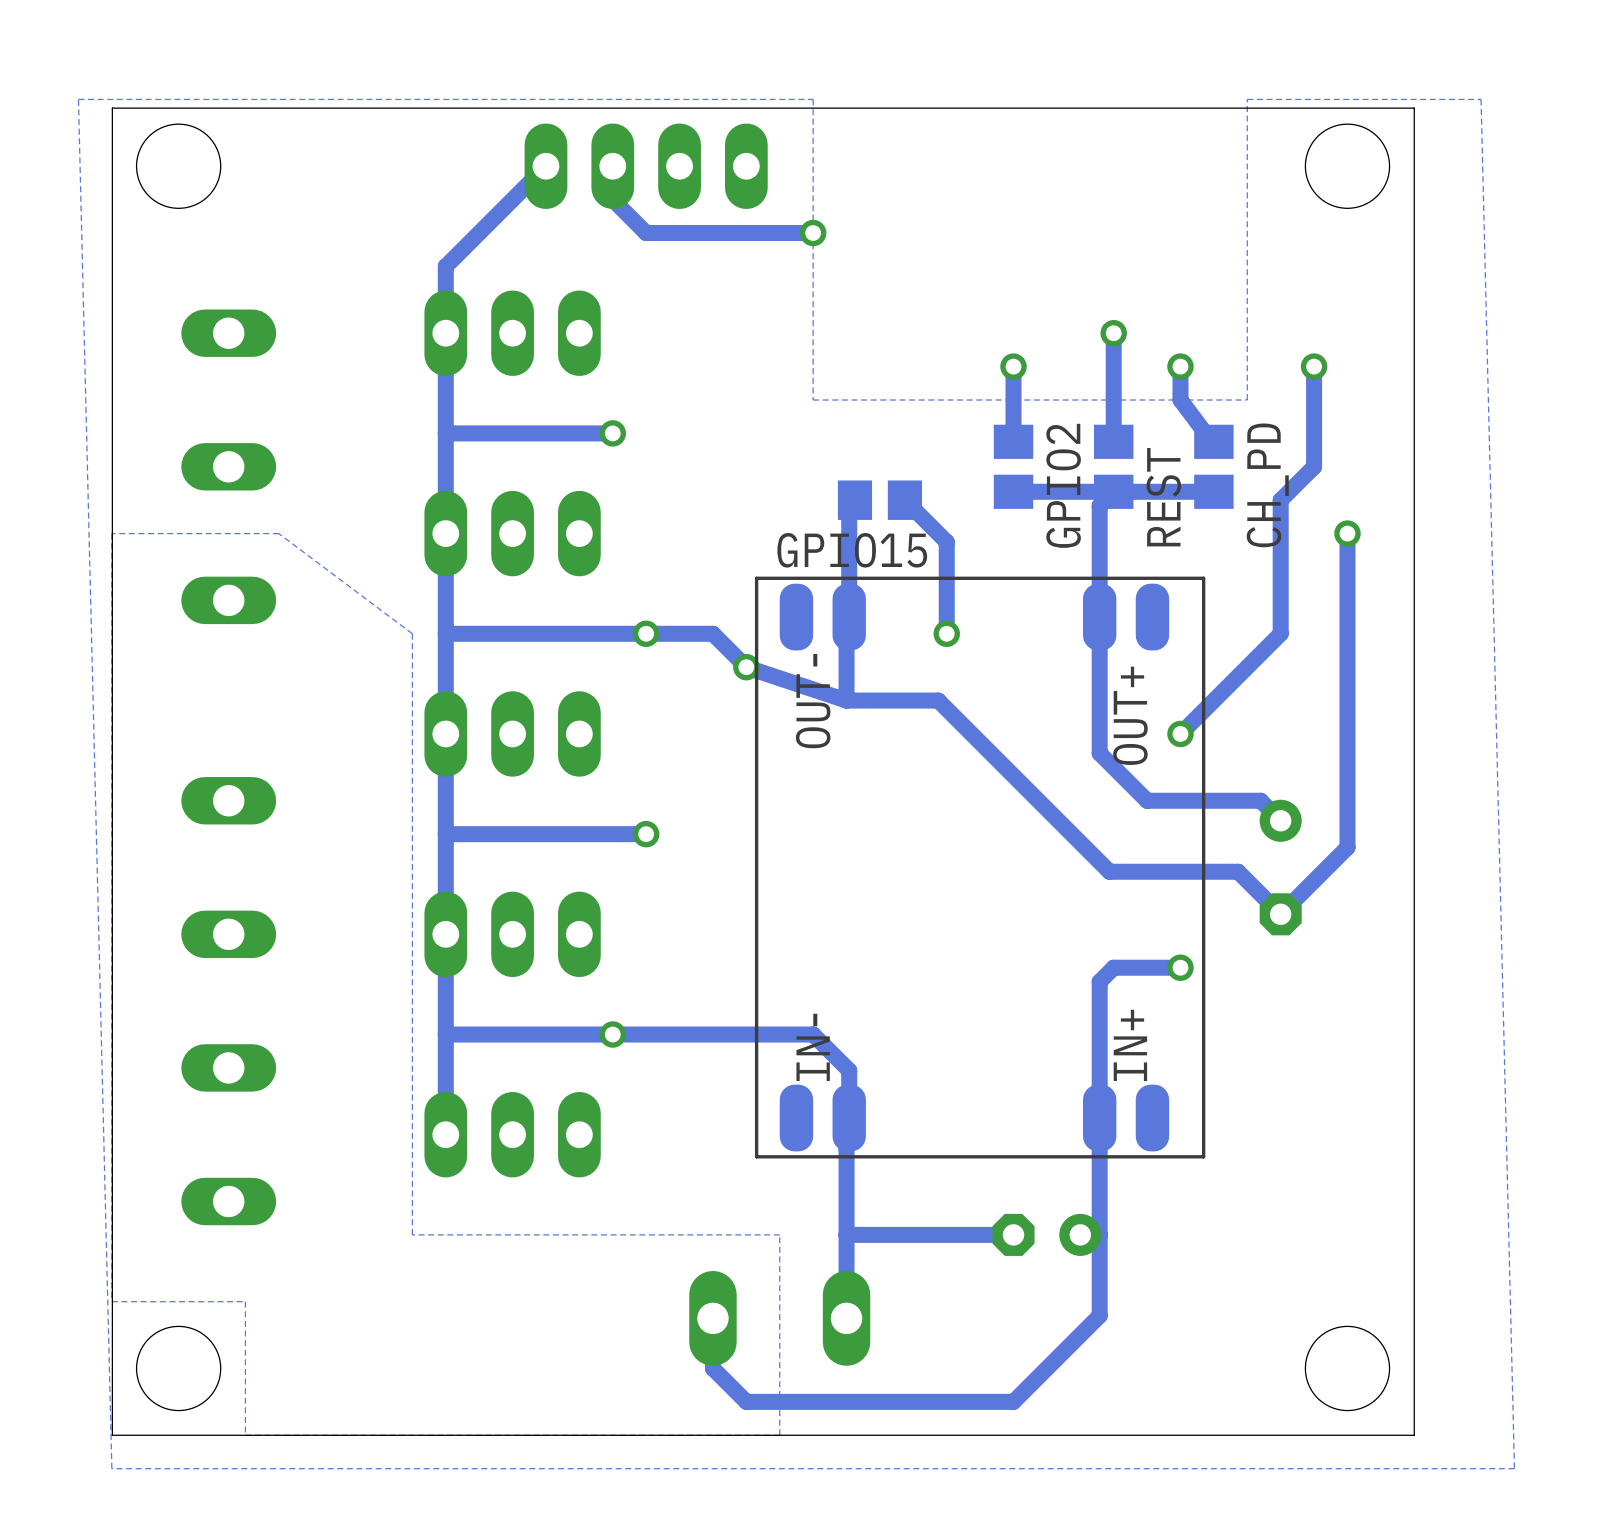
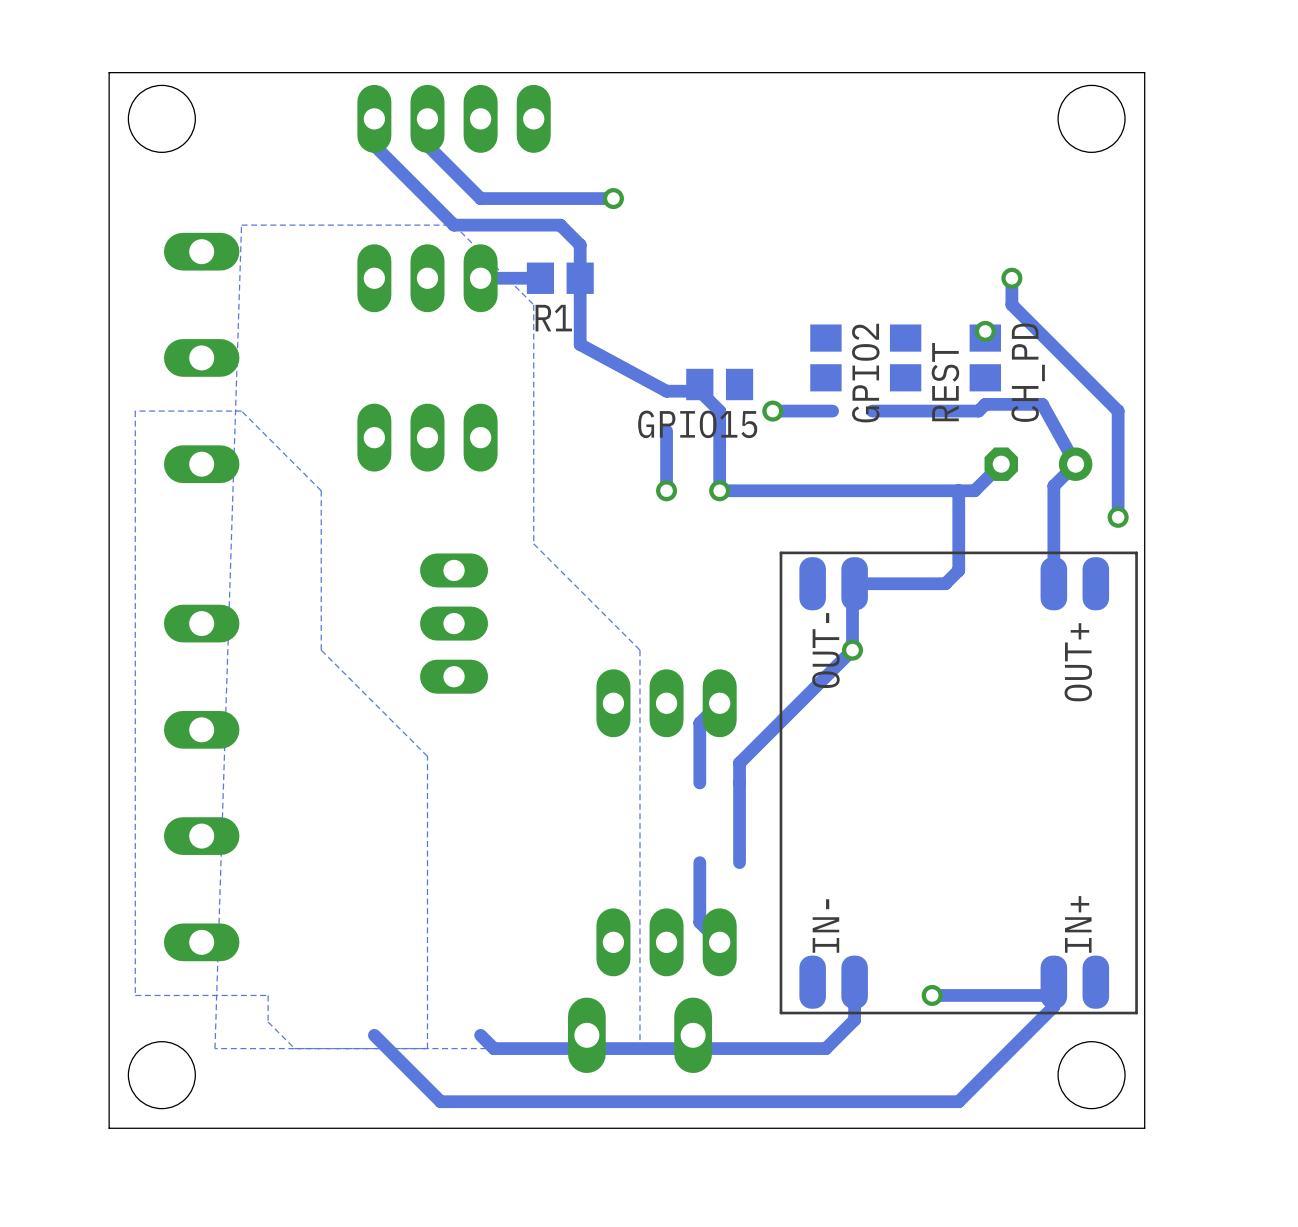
zone outline: (1481, 99) (1514, 1468) (111, 1468) (78, 99) (813, 99) (813, 400) (1247, 400) (1247, 99) (1481, 99) -> none
track: none -> (374, 118) (374, 145) (454, 225) (560, 225) (580, 244) (580, 344) (666, 391) (699, 391) (719, 411) (719, 490) (974, 490) (1001, 464)
track: none -> (427, 118) (427, 145) (480, 198) (613, 198)
track: (545, 166) (445, 266) (445, 1134) -> none
track: (612, 166) (612, 199) (646, 233) (813, 233) -> none
part position: (646, 166) -> (454, 118)
via position: (813, 233) -> (613, 198)
part position: (512, 333) -> (427, 278)
track: (1113, 333) (1113, 441) -> none
via: (1113, 333) -> none
track: none -> (540, 278) (480, 278)
R1: none -> (560, 278)
track: (1013, 366) (1013, 441) -> (666, 430) (666, 490)
via: (1013, 366) -> none
track: (1180, 366) (1180, 400) (1213, 441) -> none
via: (1180, 366) -> none
track: none -> (1011, 278) (1011, 304) (1118, 411) (1118, 517)
via: none -> (1011, 278)
track: (1314, 366) (1314, 466) (1280, 500) (1280, 633) (1180, 733) -> none
via: (1314, 366) -> none
track: (612, 433) (445, 433) -> none
via: (612, 433) -> none
via: none -> (985, 331)
track: (1113, 491) (1099, 505) (1099, 753) (1147, 800) (1260, 800) (1280, 820) -> none
track: (1213, 491) (1013, 491) -> none
track: (854, 500) (849, 505) (849, 617) (846, 619) (846, 700) -> none
track: (904, 500) (946, 542) (946, 633) -> none
zone outline: (145, 533) (111, 533) (111, 1301) (245, 1301) (245, 1435) (779, 1435) (779, 1335) -> (135, 411) (135, 995) (268, 995) (268, 1022) (294, 1048)
zone outline: (278, 533) (412, 633) (412, 1234) (779, 1234) -> (241, 411) (321, 490) (321, 650) (427, 756) (427, 1048)
part position: (512, 533) -> (427, 437)
via: none -> (772, 411)
track: none -> (832, 411) (772, 411)
track: none -> (872, 411) (978, 411) (985, 404) (1042, 404) (1075, 464) (1053, 485) (1053, 583)
track: (1347, 533) (1347, 847) (1280, 914) (1238, 871) (1109, 871) (938, 700) (846, 700) -> none
via: (1347, 533) -> none
track: (445, 633) (712, 633) (746, 667) (846, 700) -> none
via: (646, 633) -> none
via: none -> (666, 490)
via: none -> (719, 490)
via: (946, 633) -> none
track: none -> (958, 490) (958, 570) (945, 583) (854, 583) (852, 585) (852, 650) (739, 763) (739, 862)
via: (746, 667) -> none
via: none -> (1118, 517)
part: (512, 733) -> none
via: (1180, 733) -> none
part: none -> (454, 623)
track: (646, 834) (445, 834) -> none
via: (646, 834) -> none
via: none -> (852, 650)
part position: (980, 867) -> (958, 782)
part rotation: 0° (1280, 867) -> 90° clockwise (1038, 464)
part position: (1280, 867) -> (1038, 464)
part: none -> (666, 703)
track: none -> (719, 703) (699, 723) (699, 782)
part: (512, 934) -> none
track: (1180, 967) (1113, 967) (1099, 981) (1099, 1315) (1013, 1401) -> (1053, 982) (1053, 1006) (958, 1101) (825, 1101)
via: (1180, 967) -> none
track: (445, 1034) (813, 1034) (849, 1070) (849, 1118) (846, 1148) (846, 1318) -> none
via: (612, 1034) -> none
track: none -> (699, 862) (699, 922) (719, 942)
part: (512, 1134) -> none
part: none -> (666, 942)
zone outline: none -> (639, 968) (639, 650) (533, 543) (533, 304) (454, 225) (241, 225) (214, 1048) (639, 1048)
track: (1013, 1234) (846, 1234) -> none
part: (1046, 1234) -> none
track: none -> (854, 982) (854, 1019) (825, 1048) (493, 1048) (480, 1035)
via: none -> (932, 995)
track: none -> (1053, 995) (932, 995)
track: (712, 1318) (712, 1368) (746, 1401) -> (374, 1035) (440, 1101) (613, 1101)

